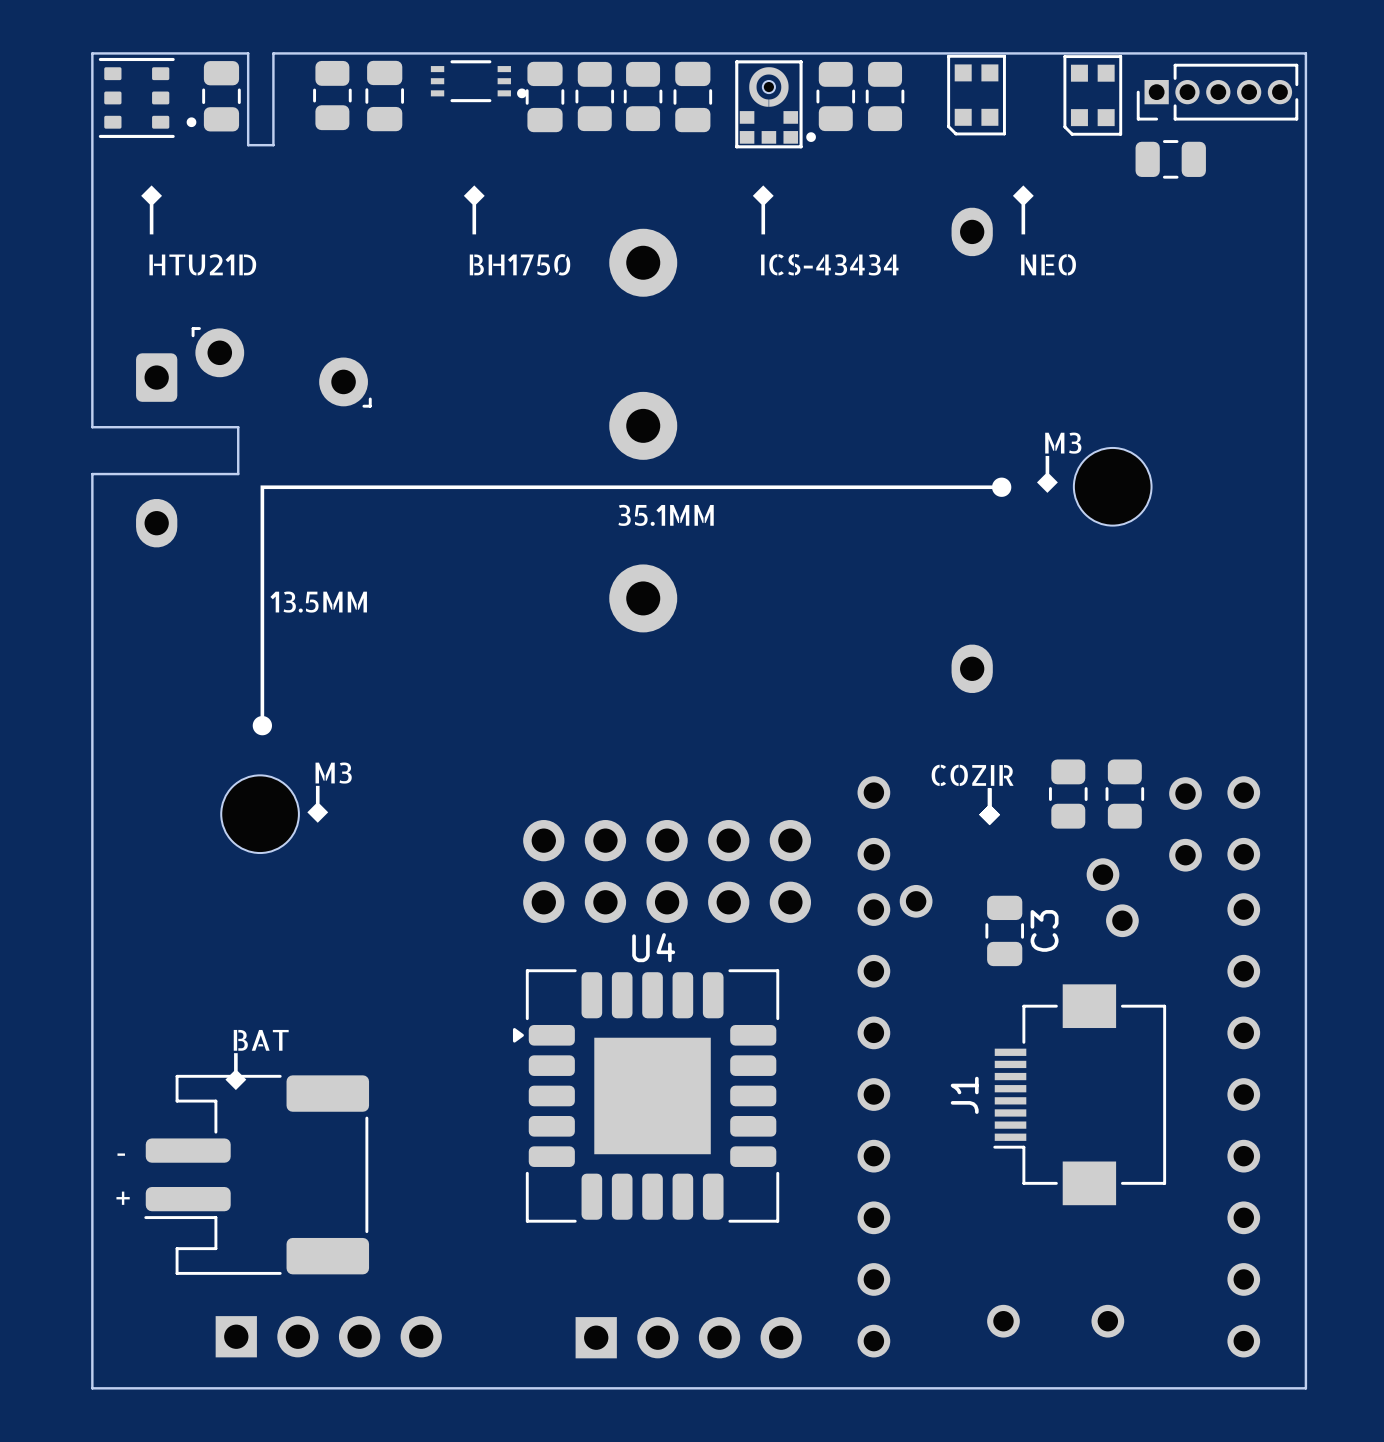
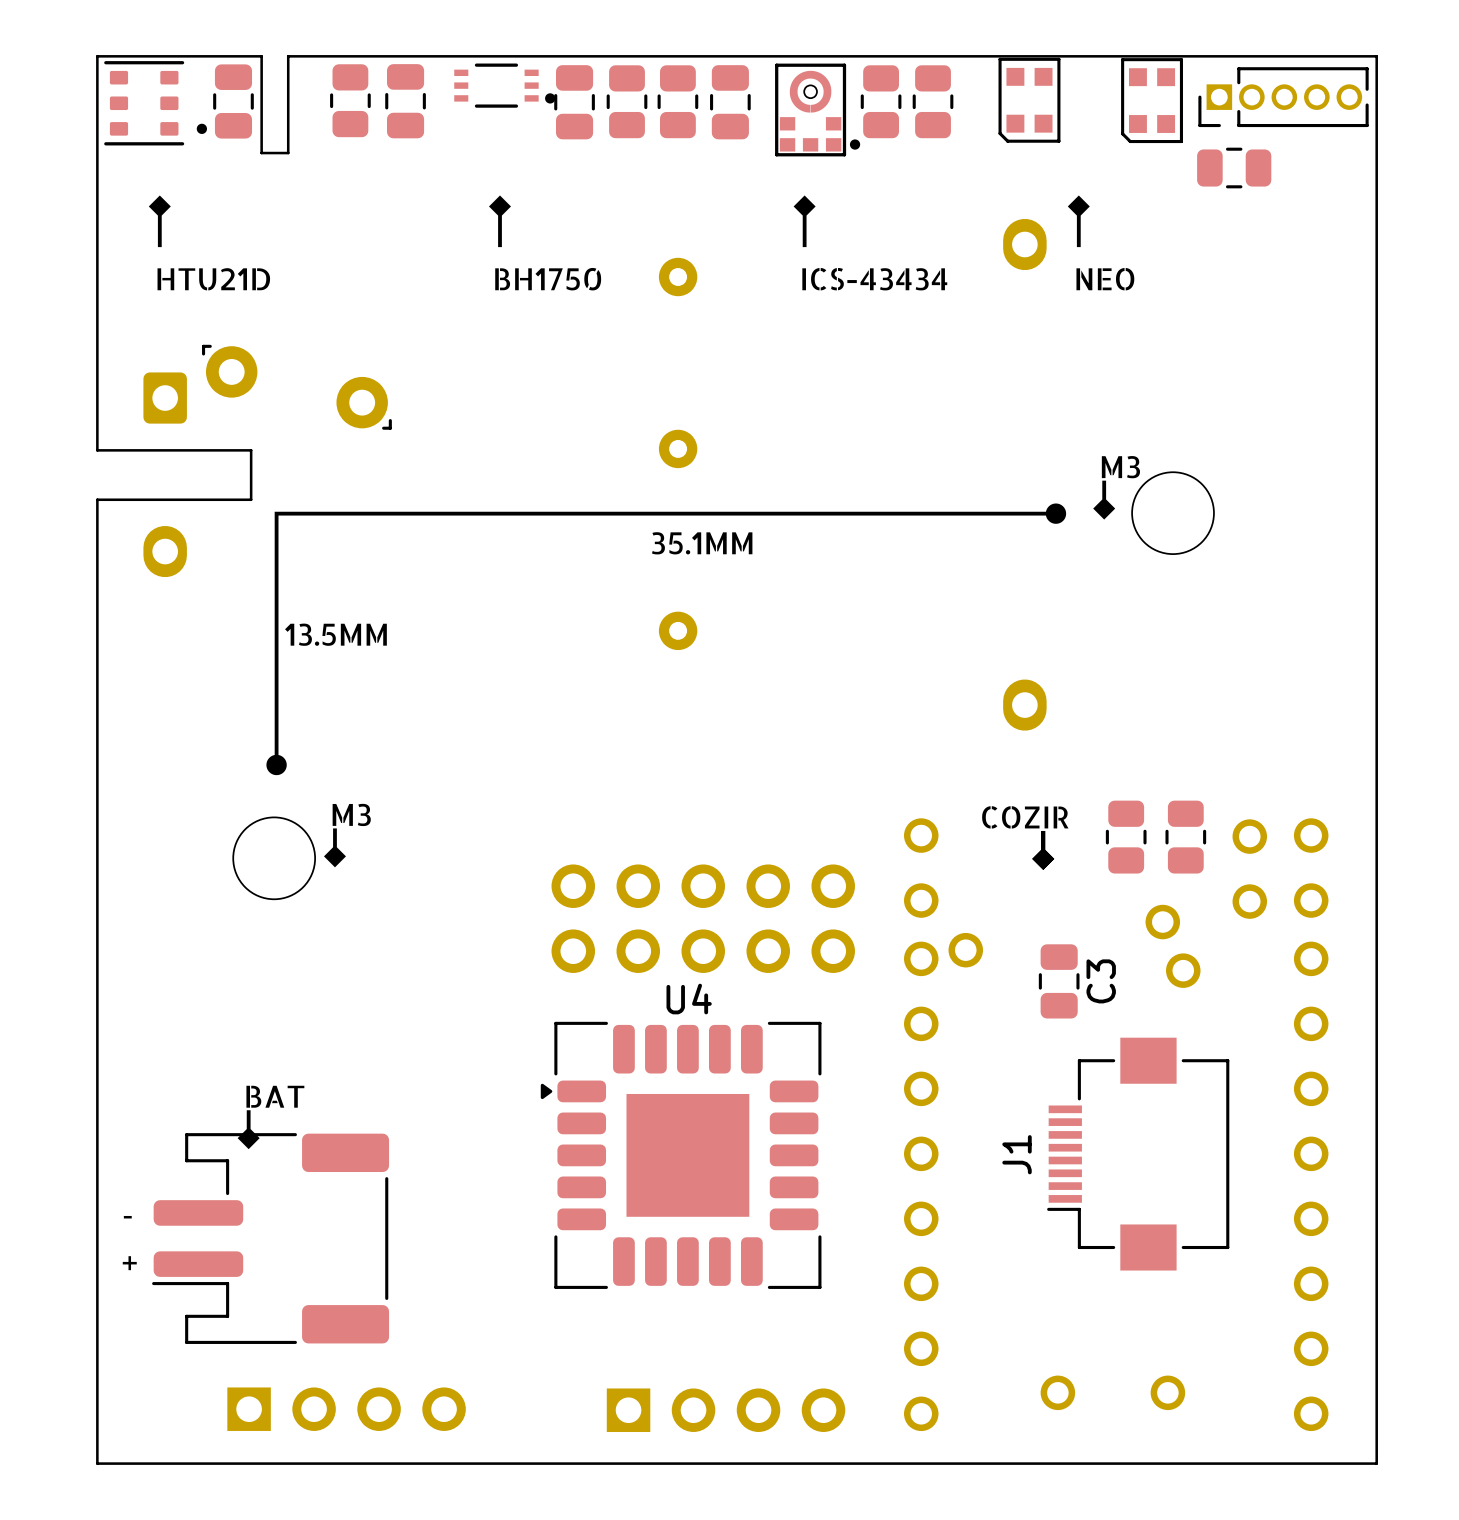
part footprint: [609, 228, 678, 297] -> [658, 257, 698, 297]
part footprint: [609, 391, 678, 460] -> [658, 429, 698, 469]
part footprint: [609, 564, 678, 633] -> [658, 611, 698, 651]

